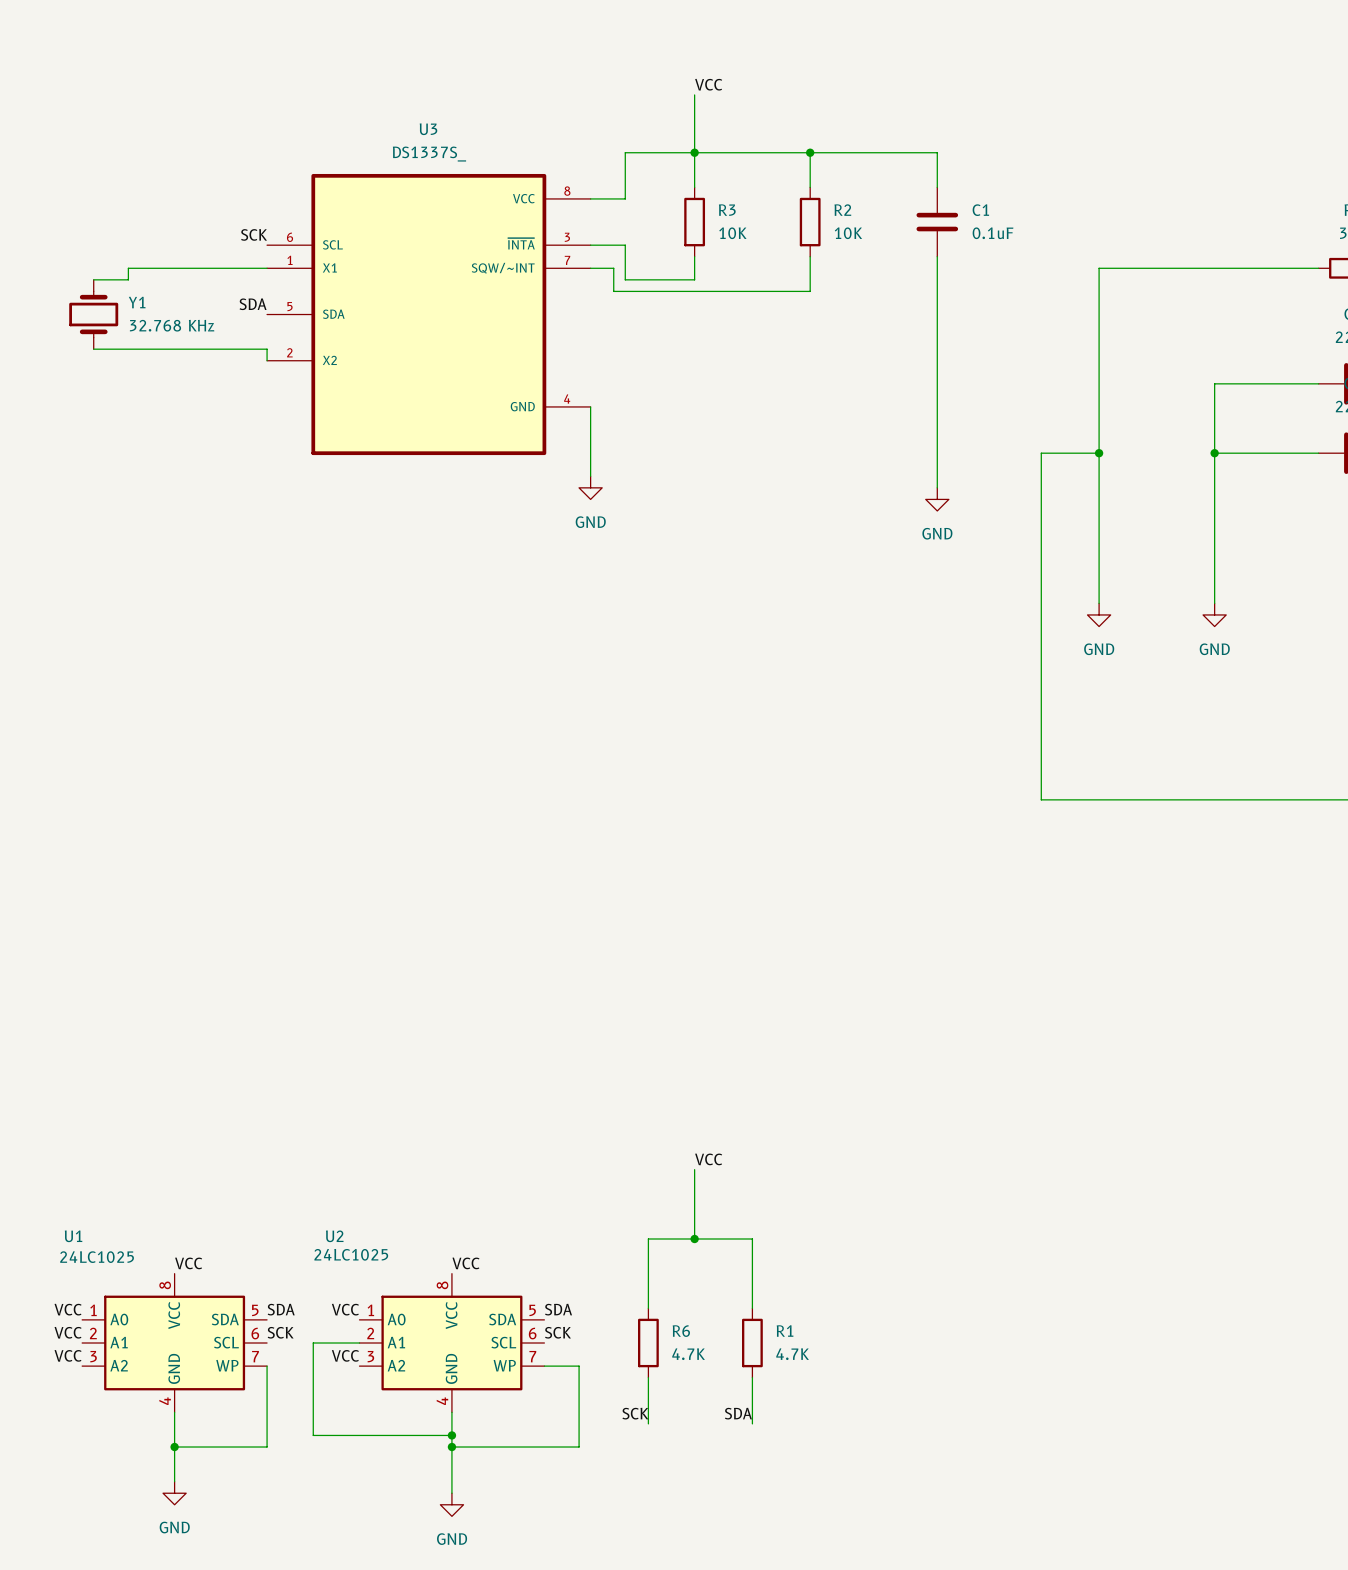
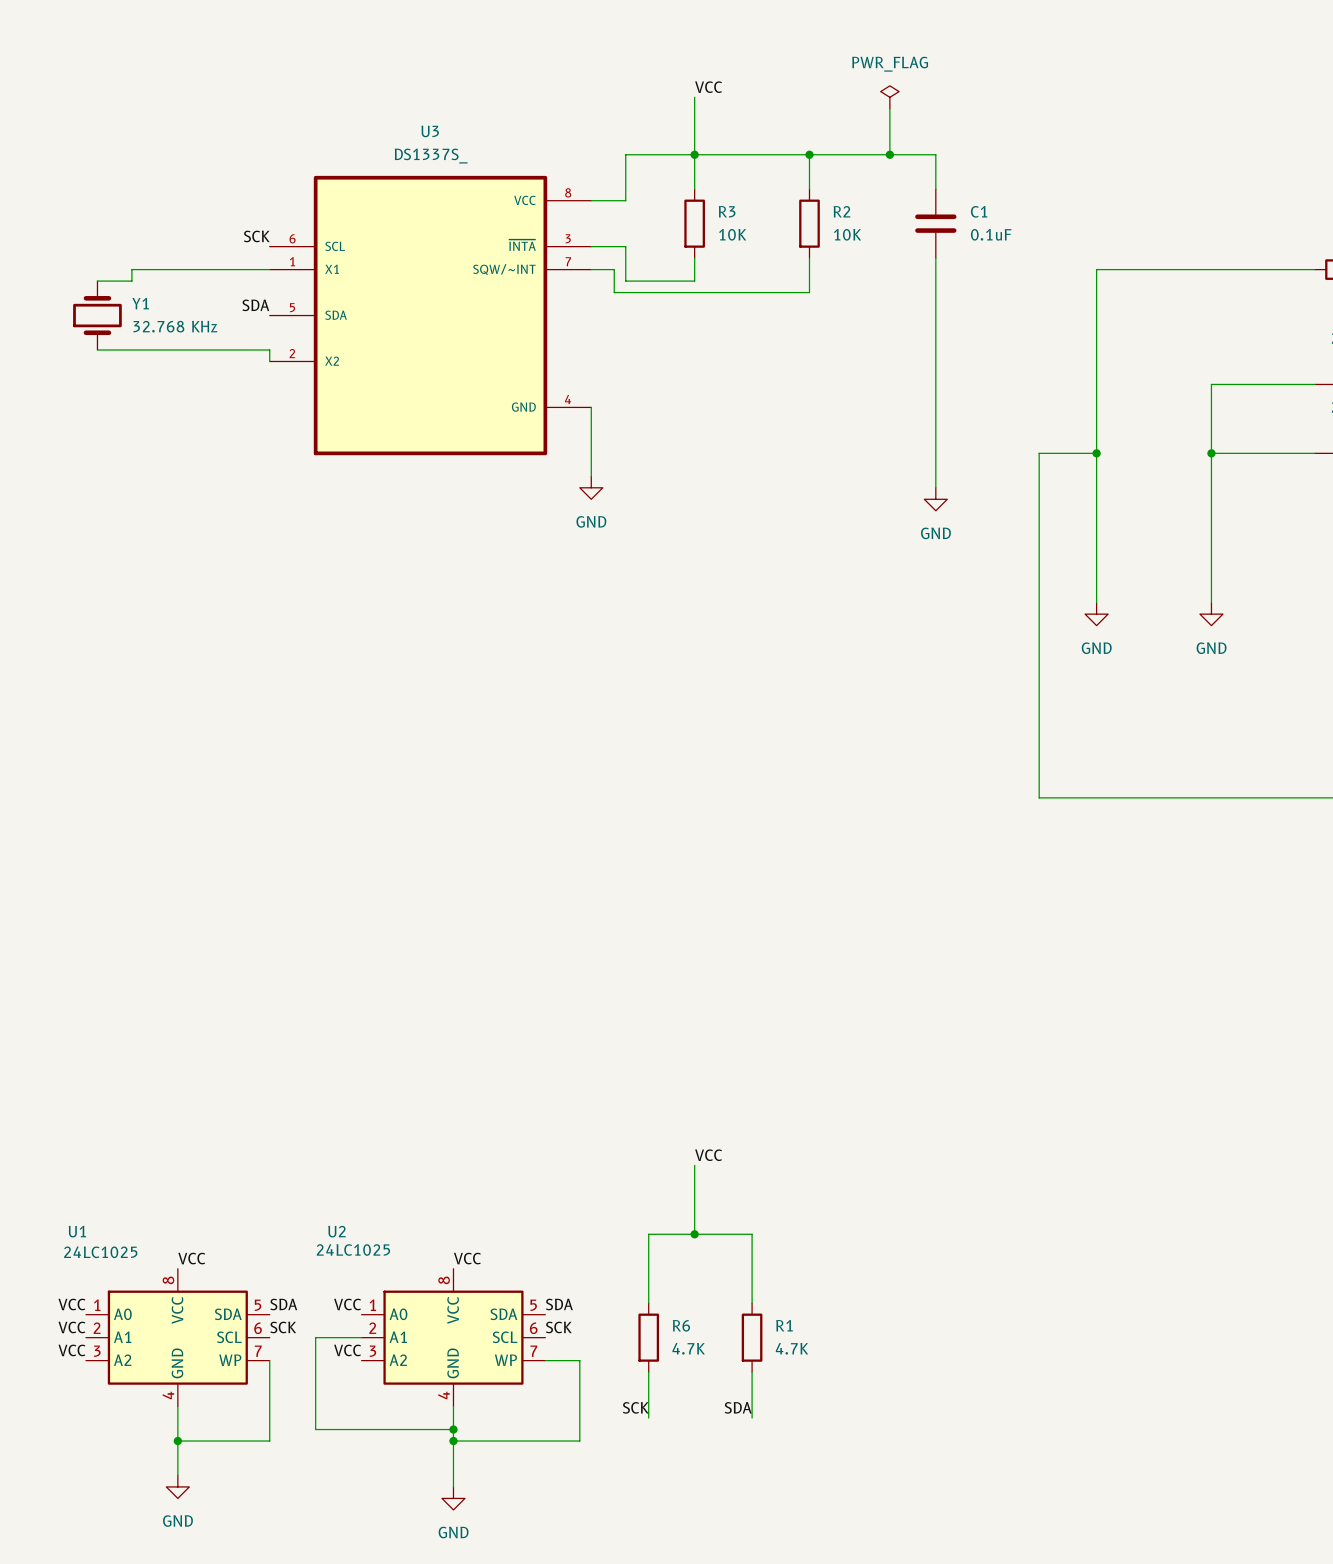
power symbol: none -> PWR_FLAG (889, 97)
wire: none -> (889, 108) (889, 154)
junction: none -> (889, 154)

